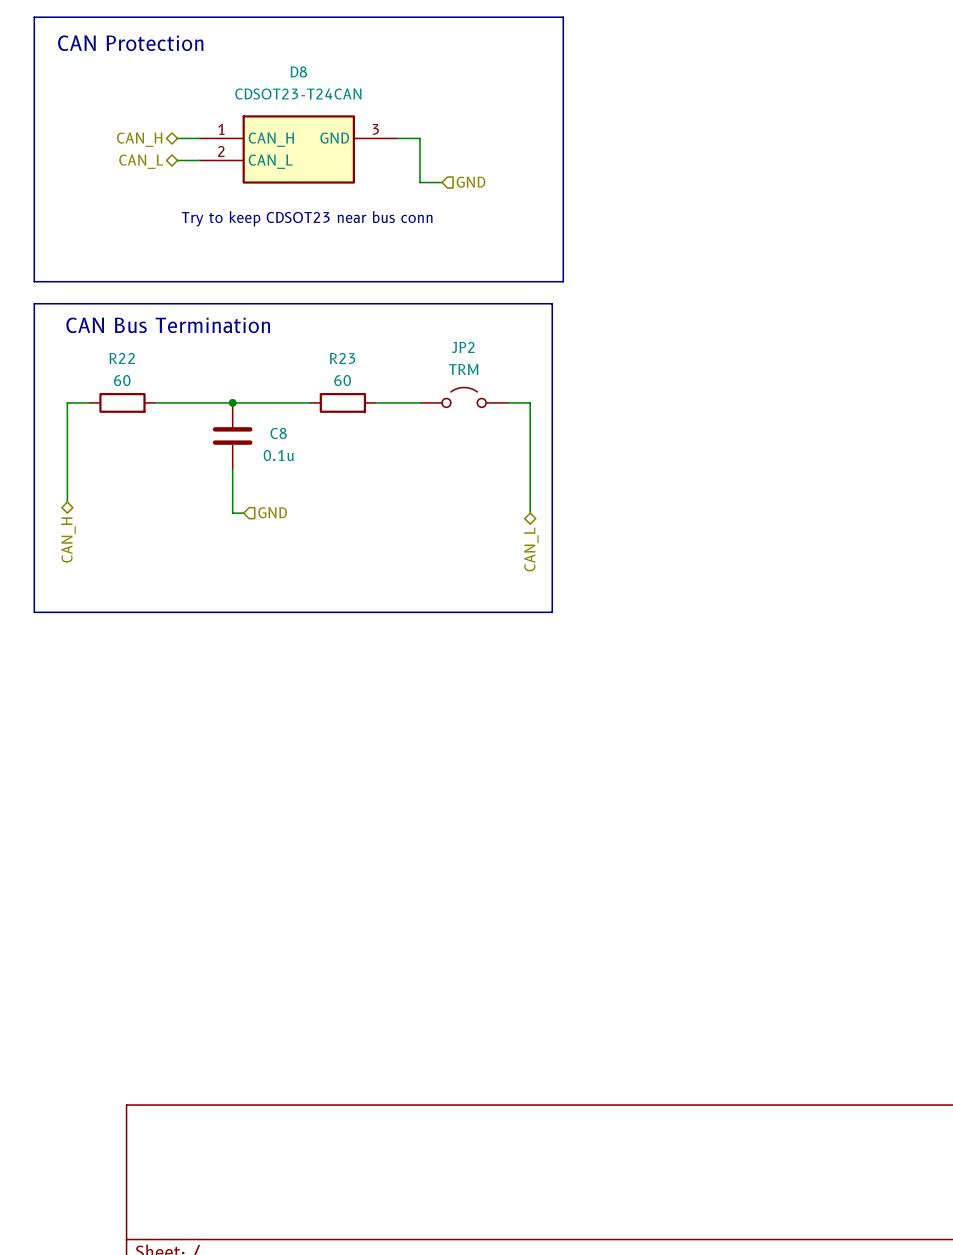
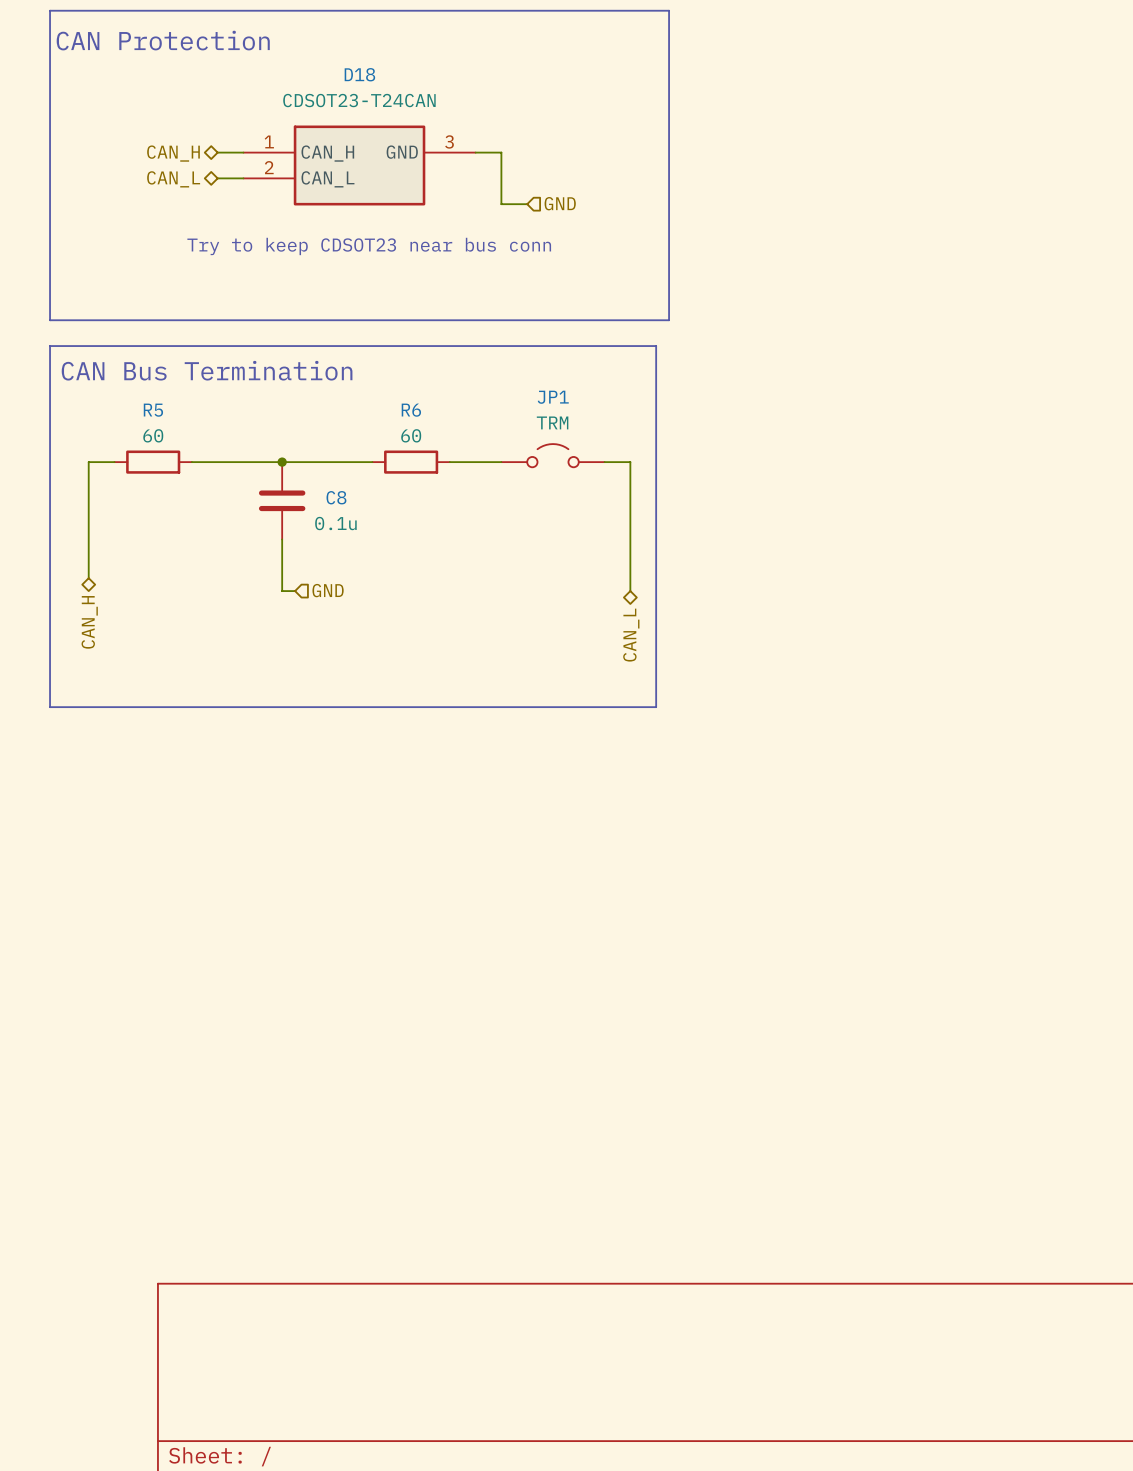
D8 name: D8 (298, 71) -> D18 (359, 74)
JP2 name: JP2 (463, 347) -> JP1 (553, 397)
R22 name: R22 (122, 358) -> R5 (153, 410)
R23 name: R23 (342, 358) -> R6 (411, 410)

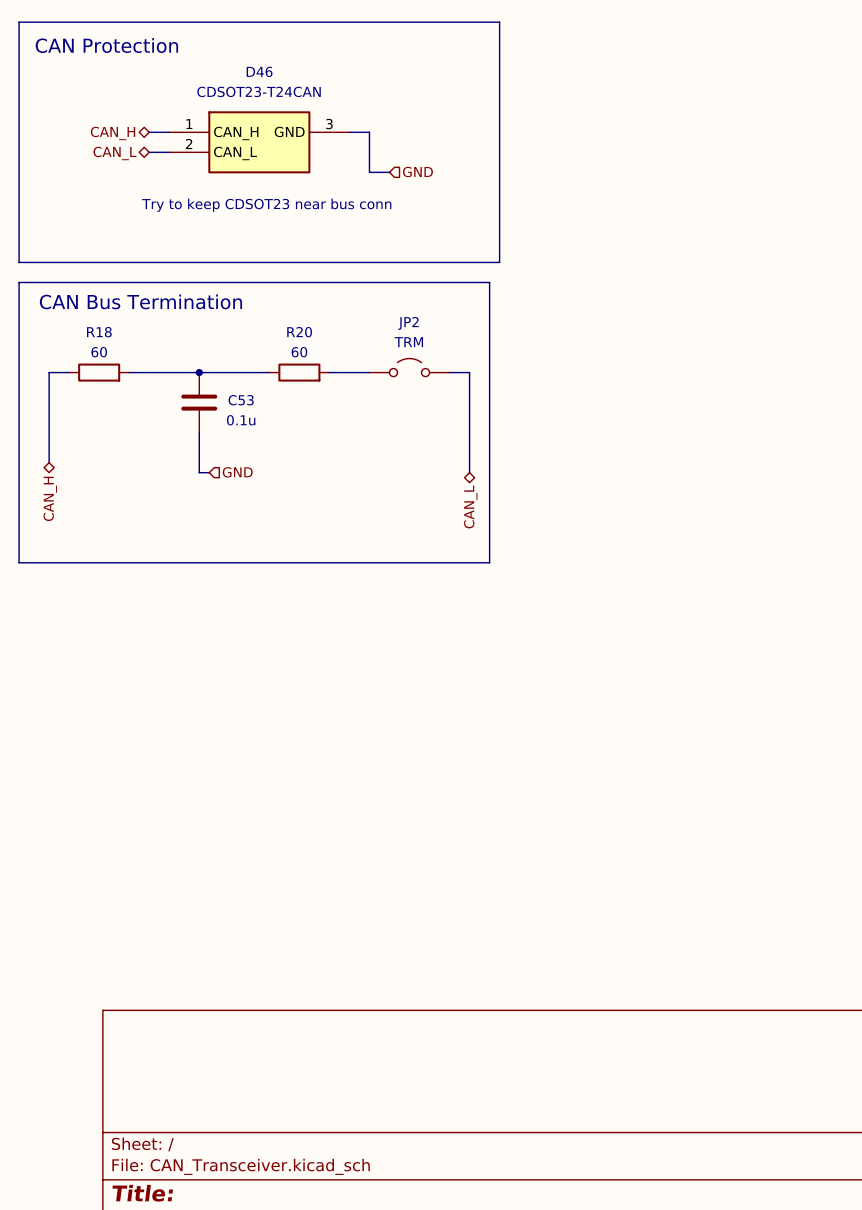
D18 name: D18 (359, 74) -> D46 (259, 71)
JP1 name: JP1 (553, 397) -> JP2 (408, 323)
R5 name: R5 (153, 410) -> R18 (99, 332)
R6 name: R6 (411, 410) -> R20 (299, 332)
C8 name: C8 (336, 497) -> C53 (241, 400)

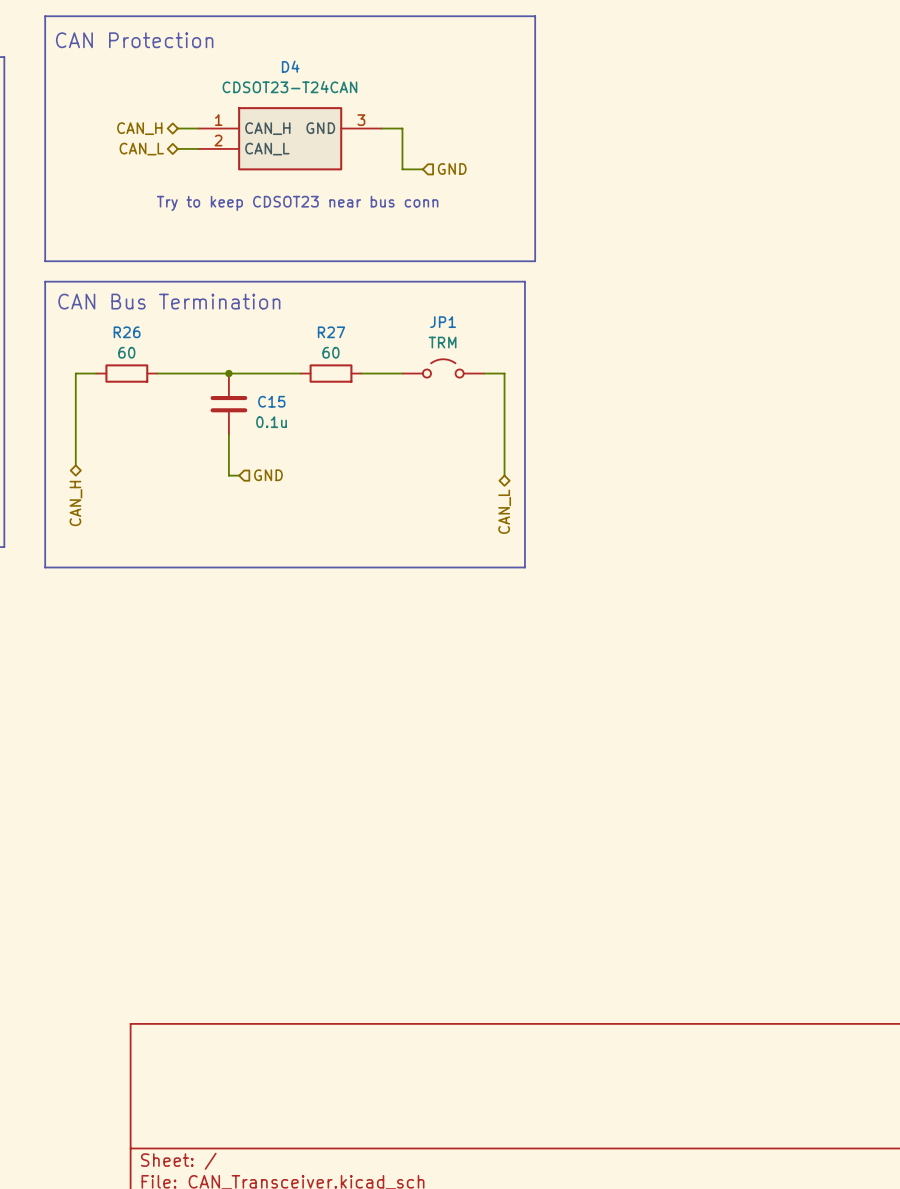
D46 name: D46 (259, 71) -> D4 (290, 66)
JP2 name: JP2 (408, 323) -> JP1 (443, 322)
R18 name: R18 (99, 332) -> R26 (127, 332)
R20 name: R20 (299, 332) -> R27 (331, 332)
C53 name: C53 (241, 400) -> C15 (271, 401)

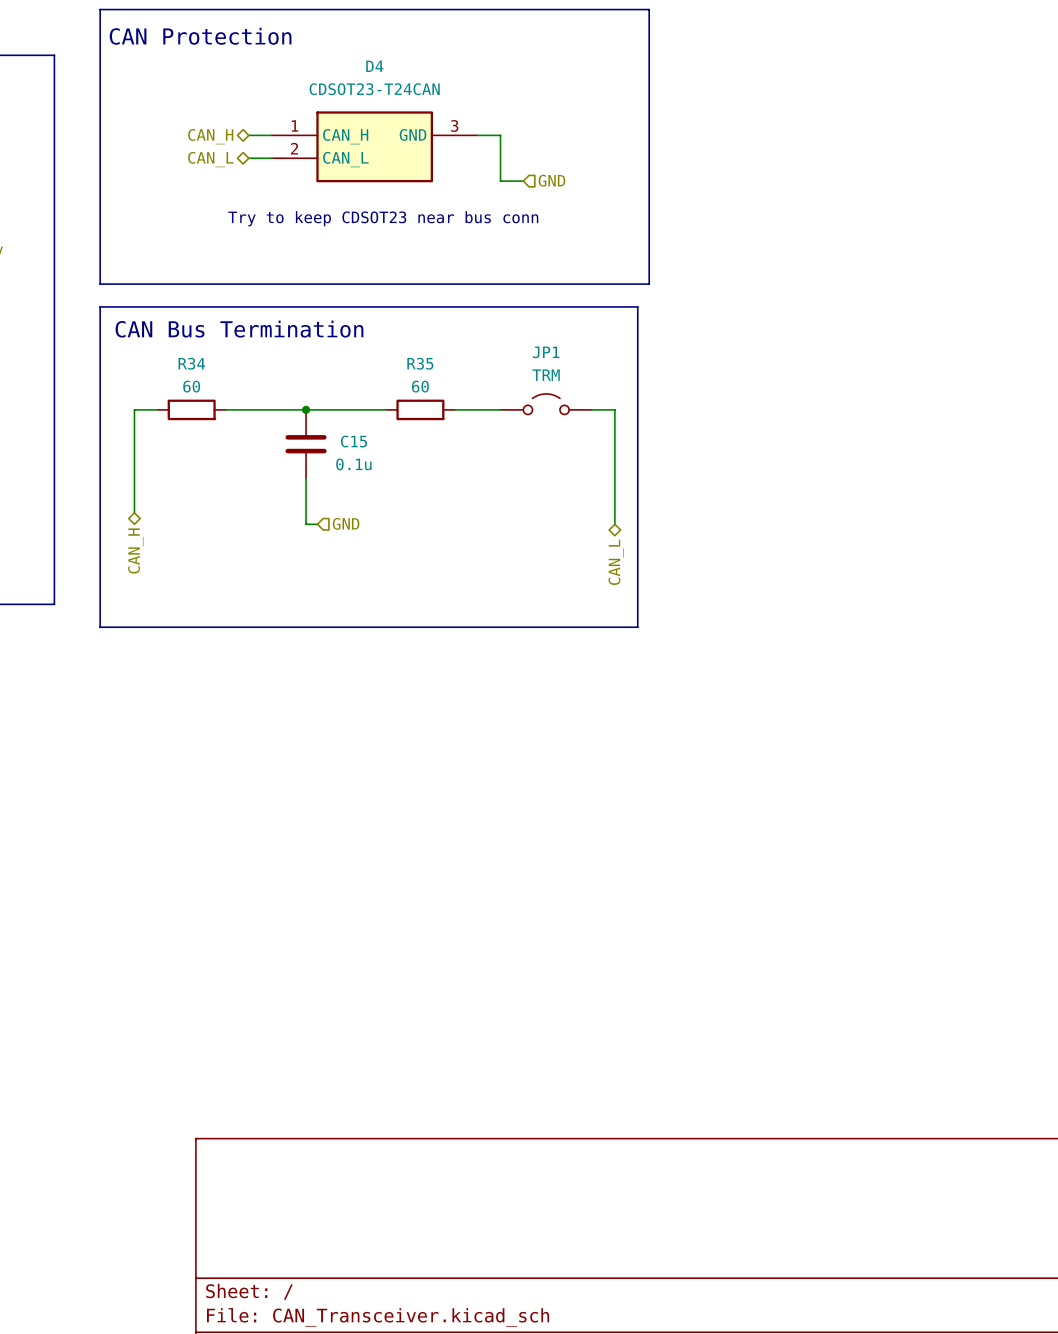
R26 name: R26 (127, 332) -> R34 (191, 363)
R27 name: R27 (331, 332) -> R35 (420, 363)

